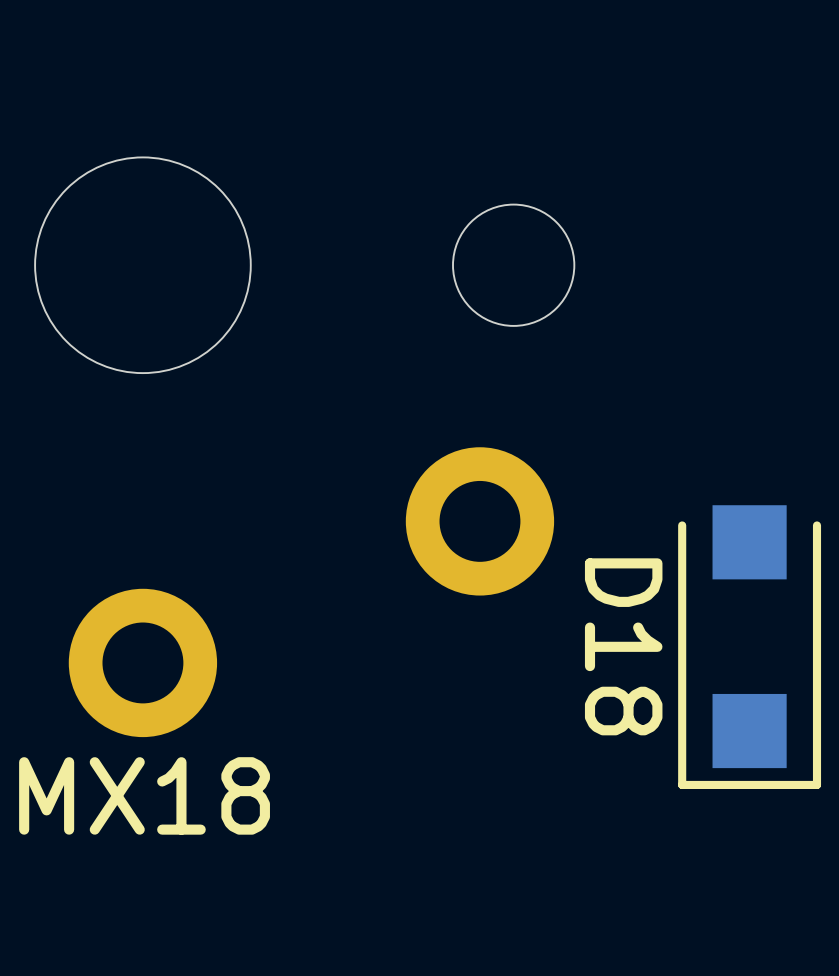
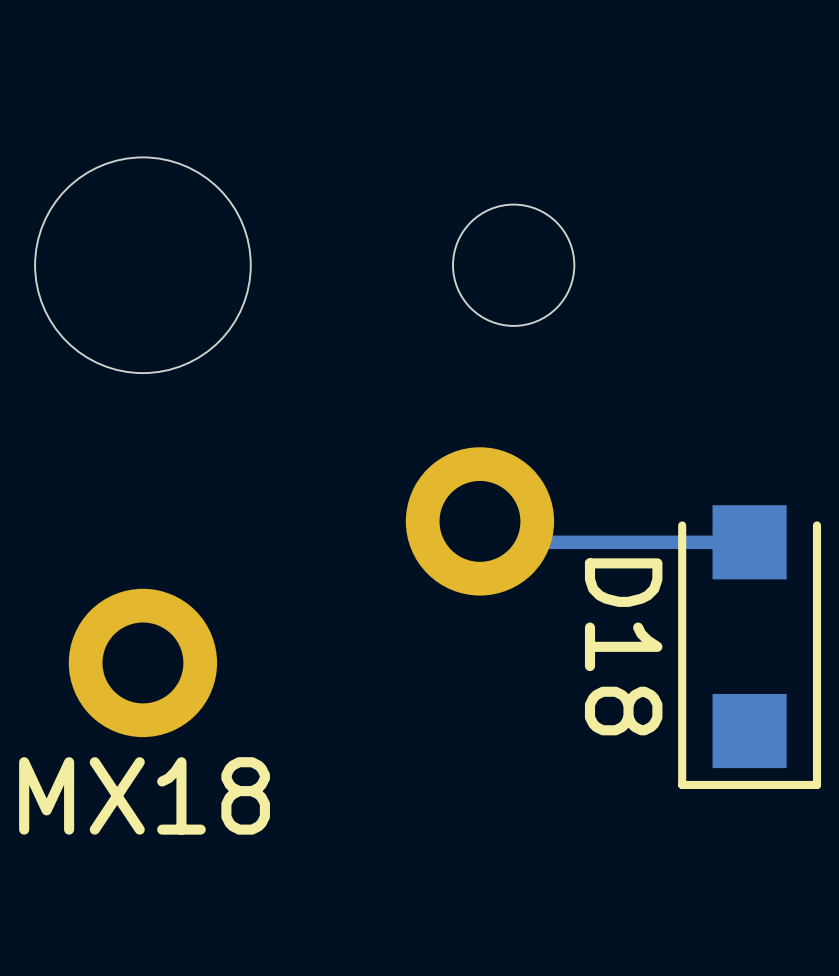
track: none -> (479, 521) (500, 542) (749, 542)

